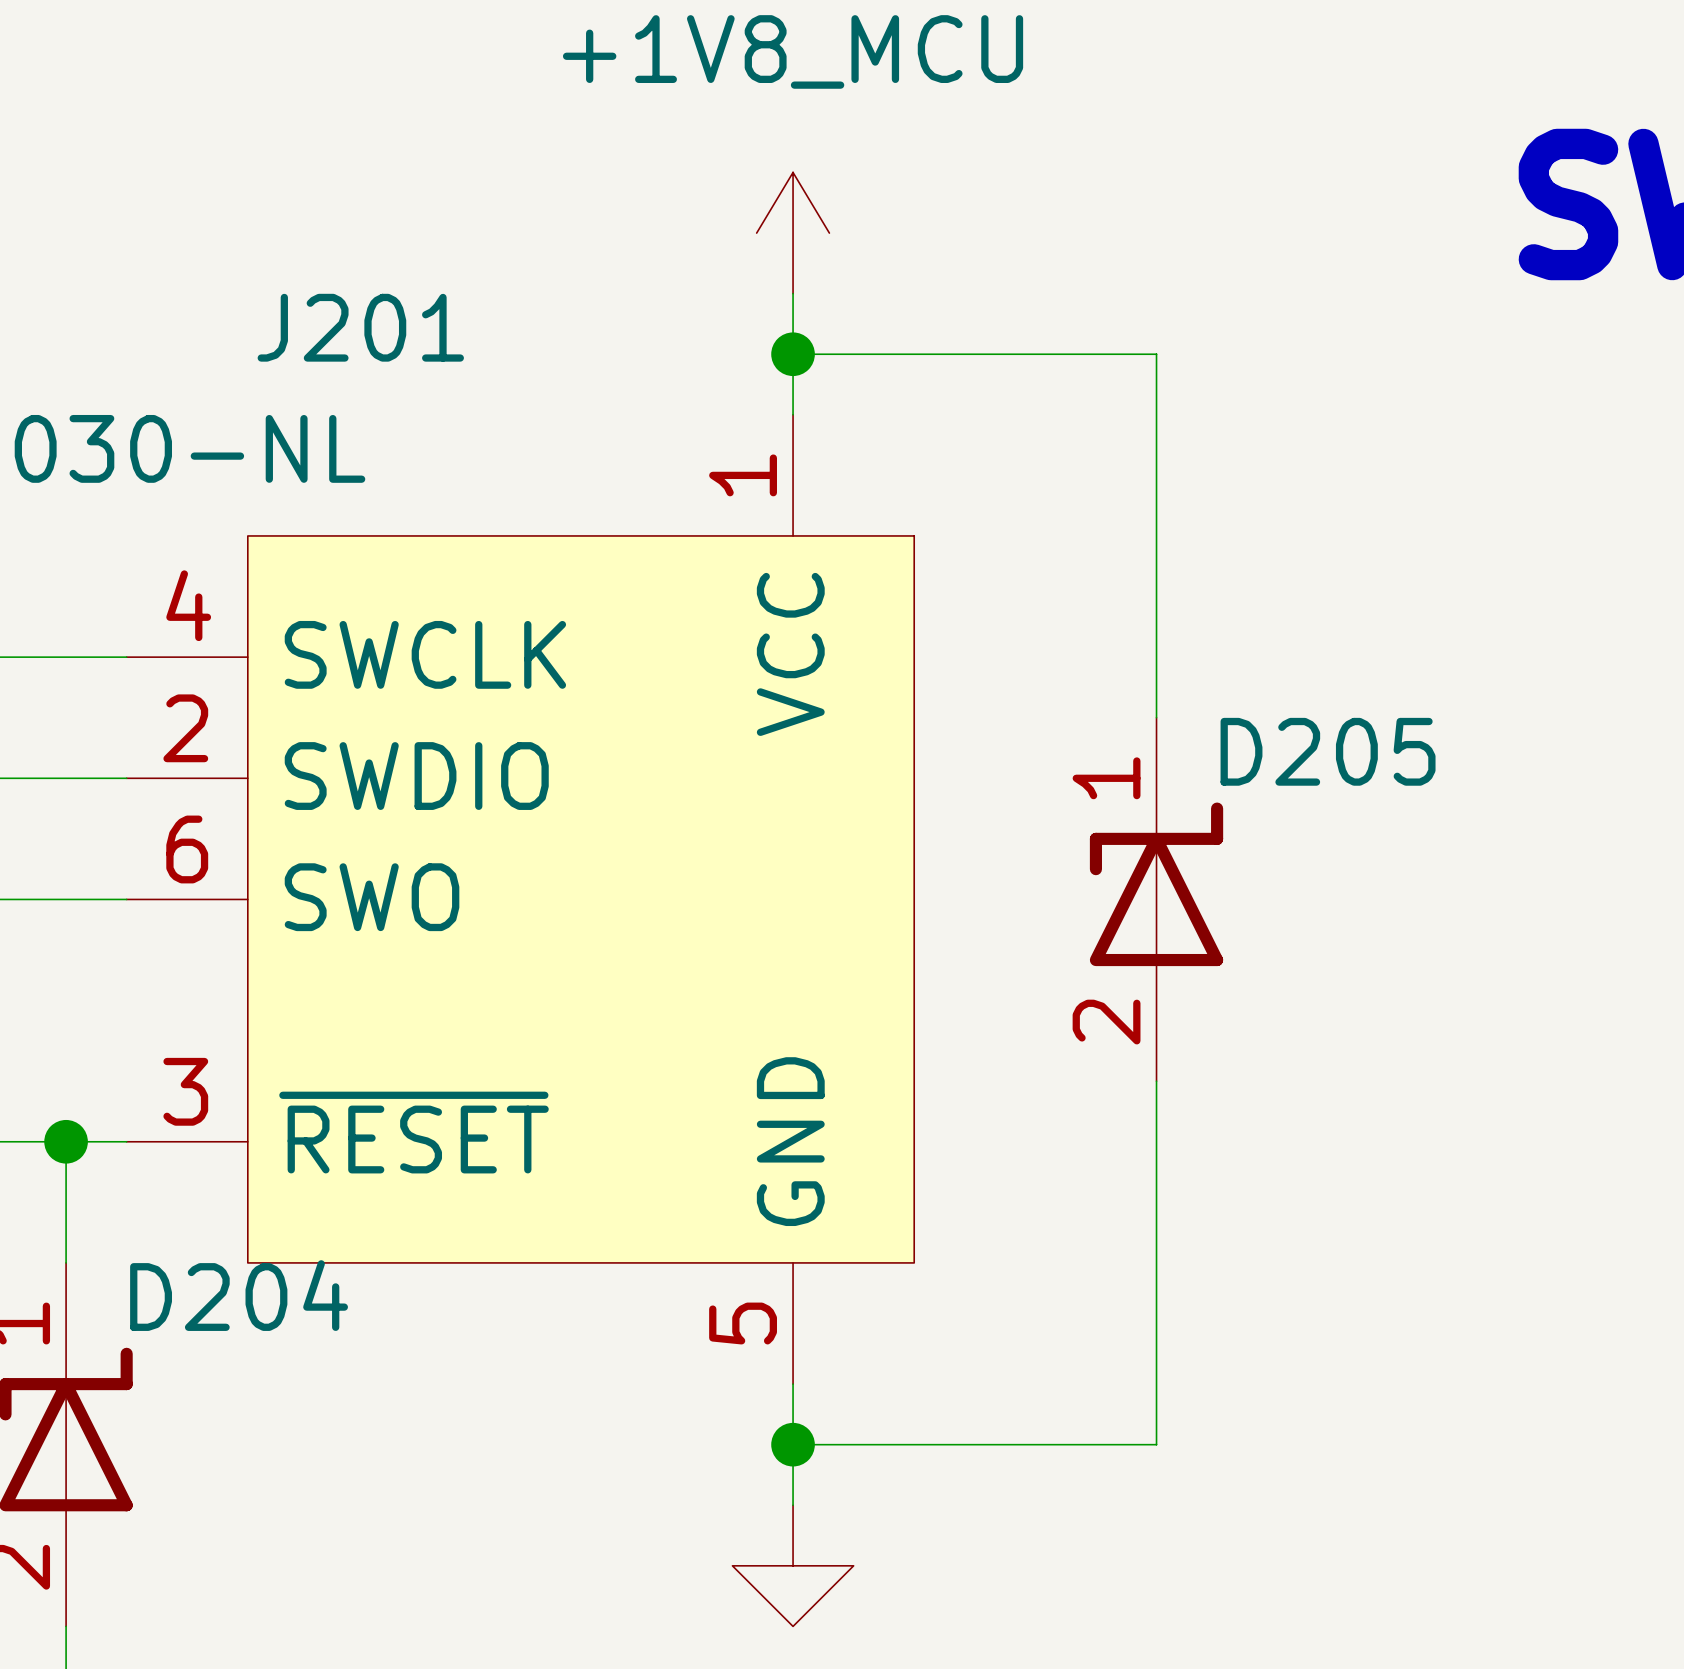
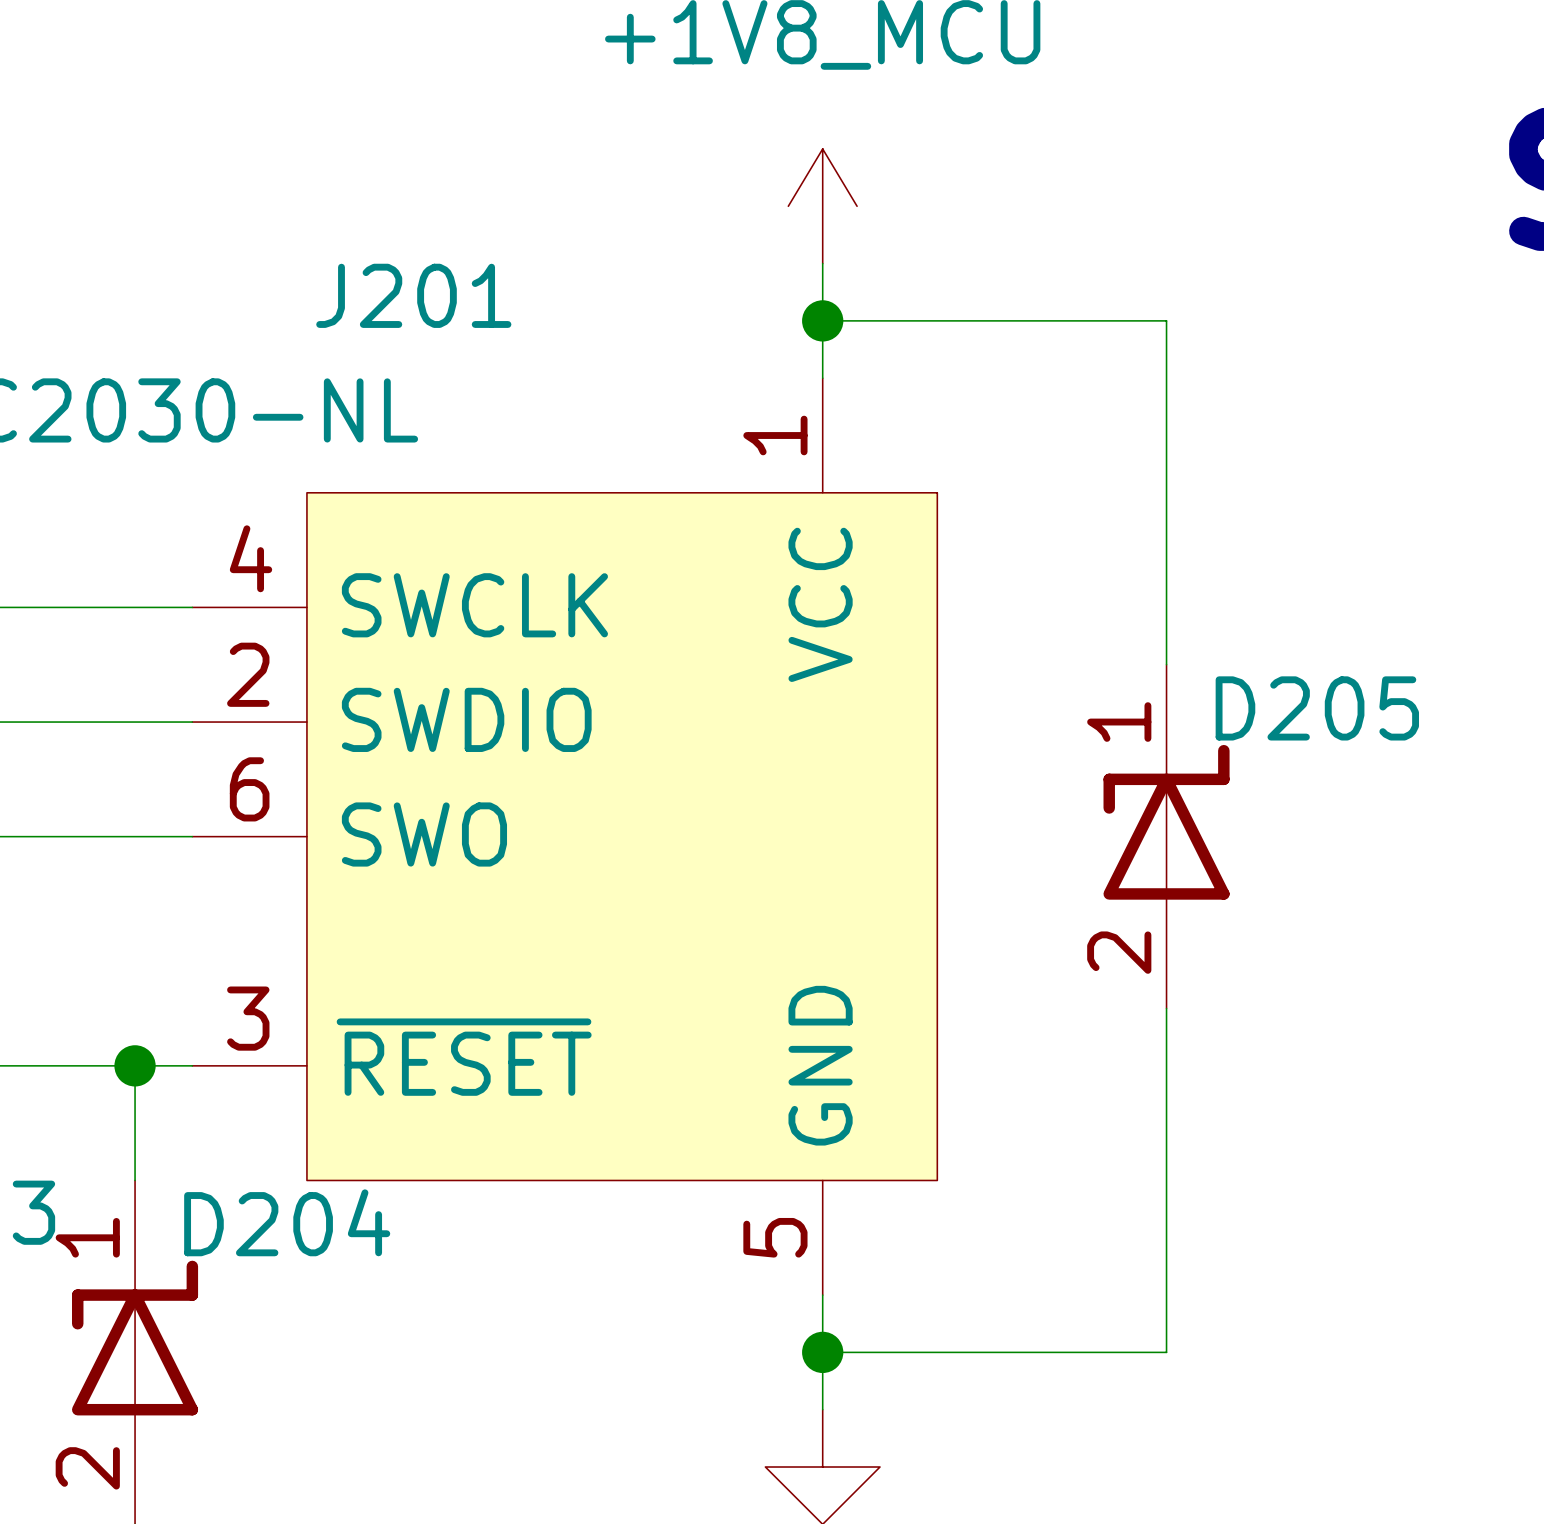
D205 name position: D205 (1328, 751) -> D205 (1317, 708)
D204 name position: D204 (239, 1295) -> D204 (287, 1222)

